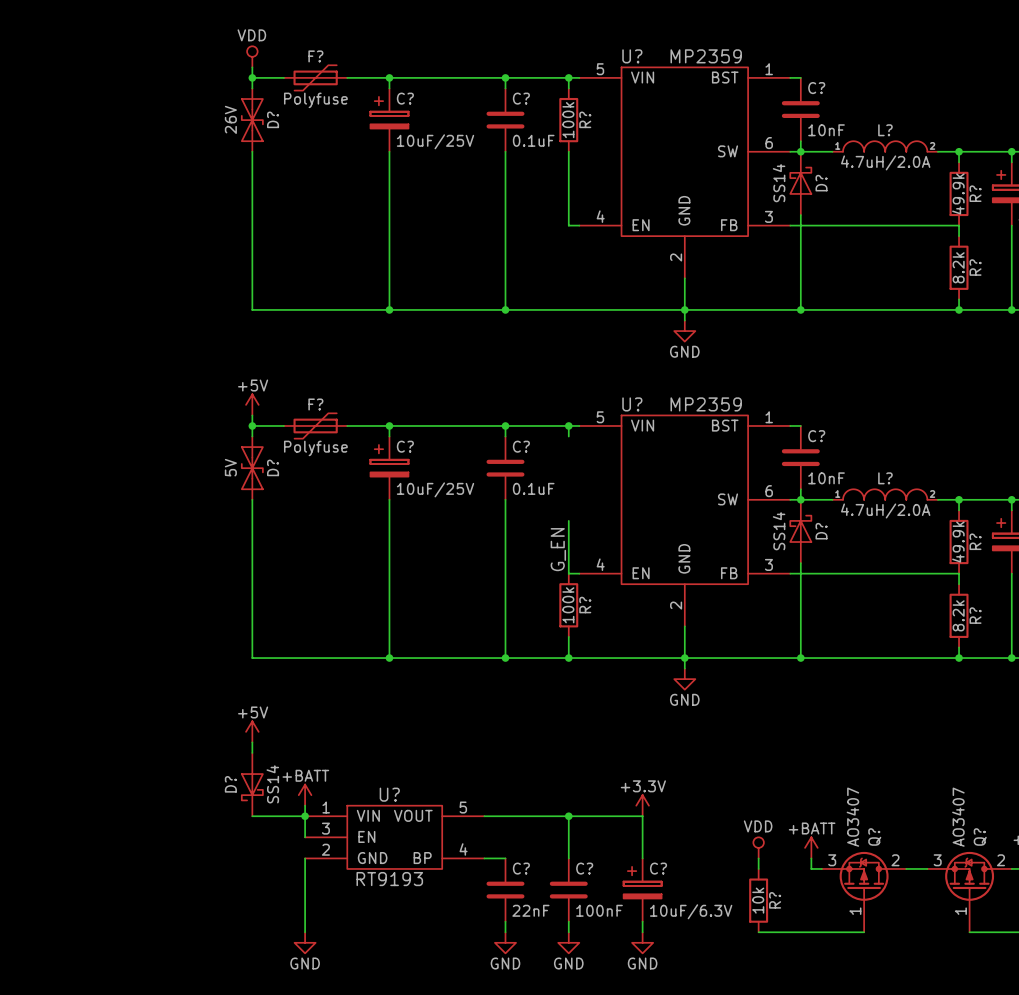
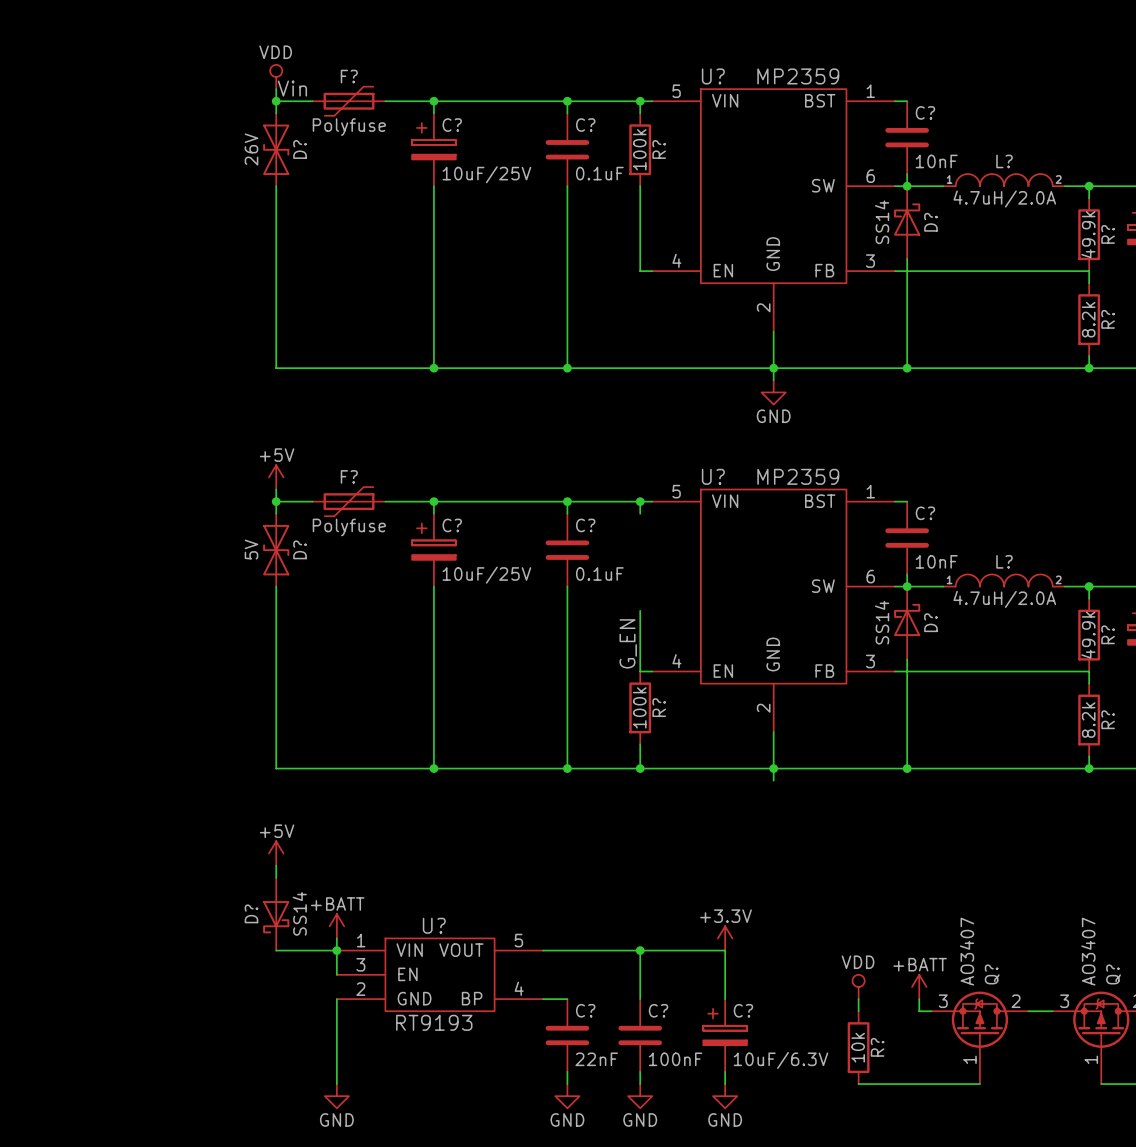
label: none -> Vin (292, 88)
power symbol: GND (684, 679) -> none

